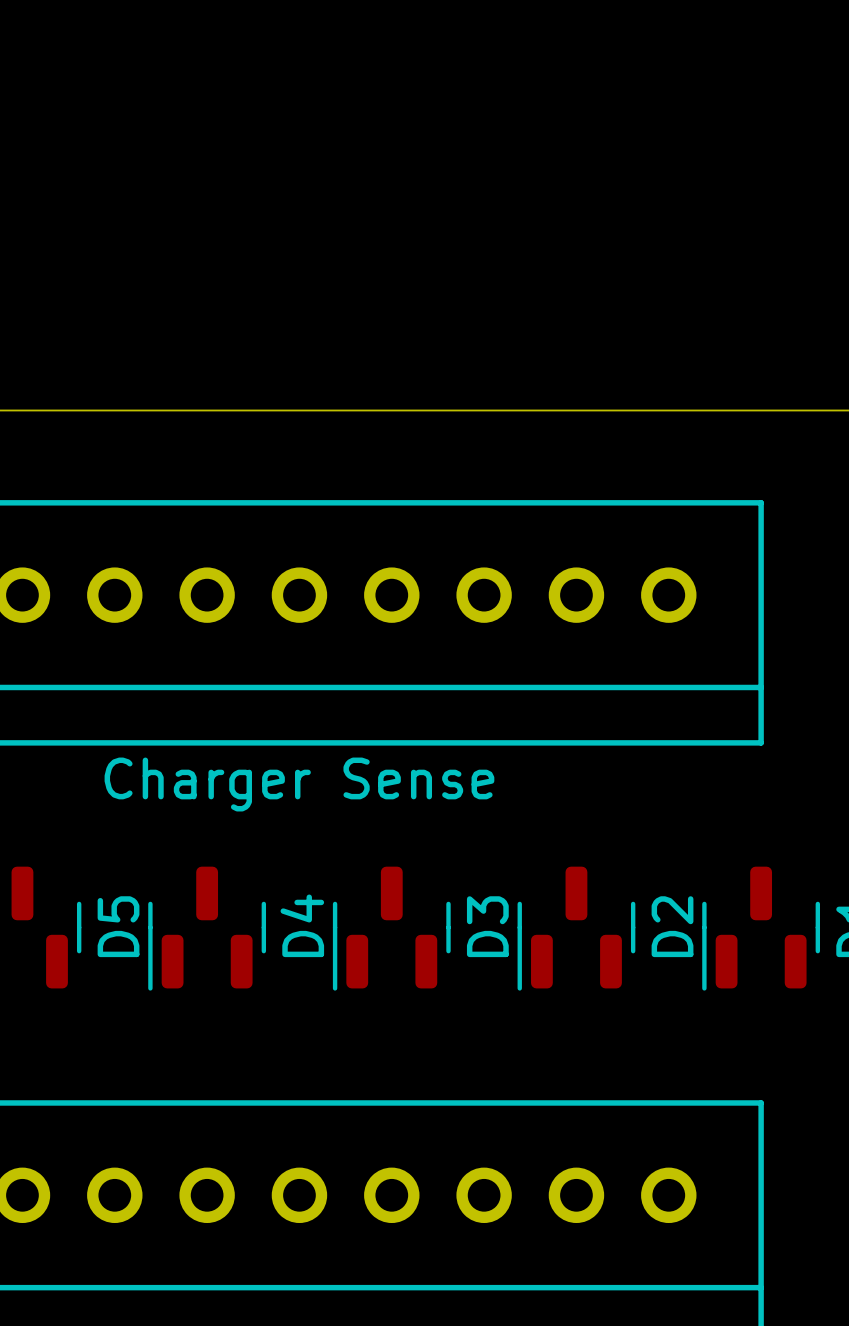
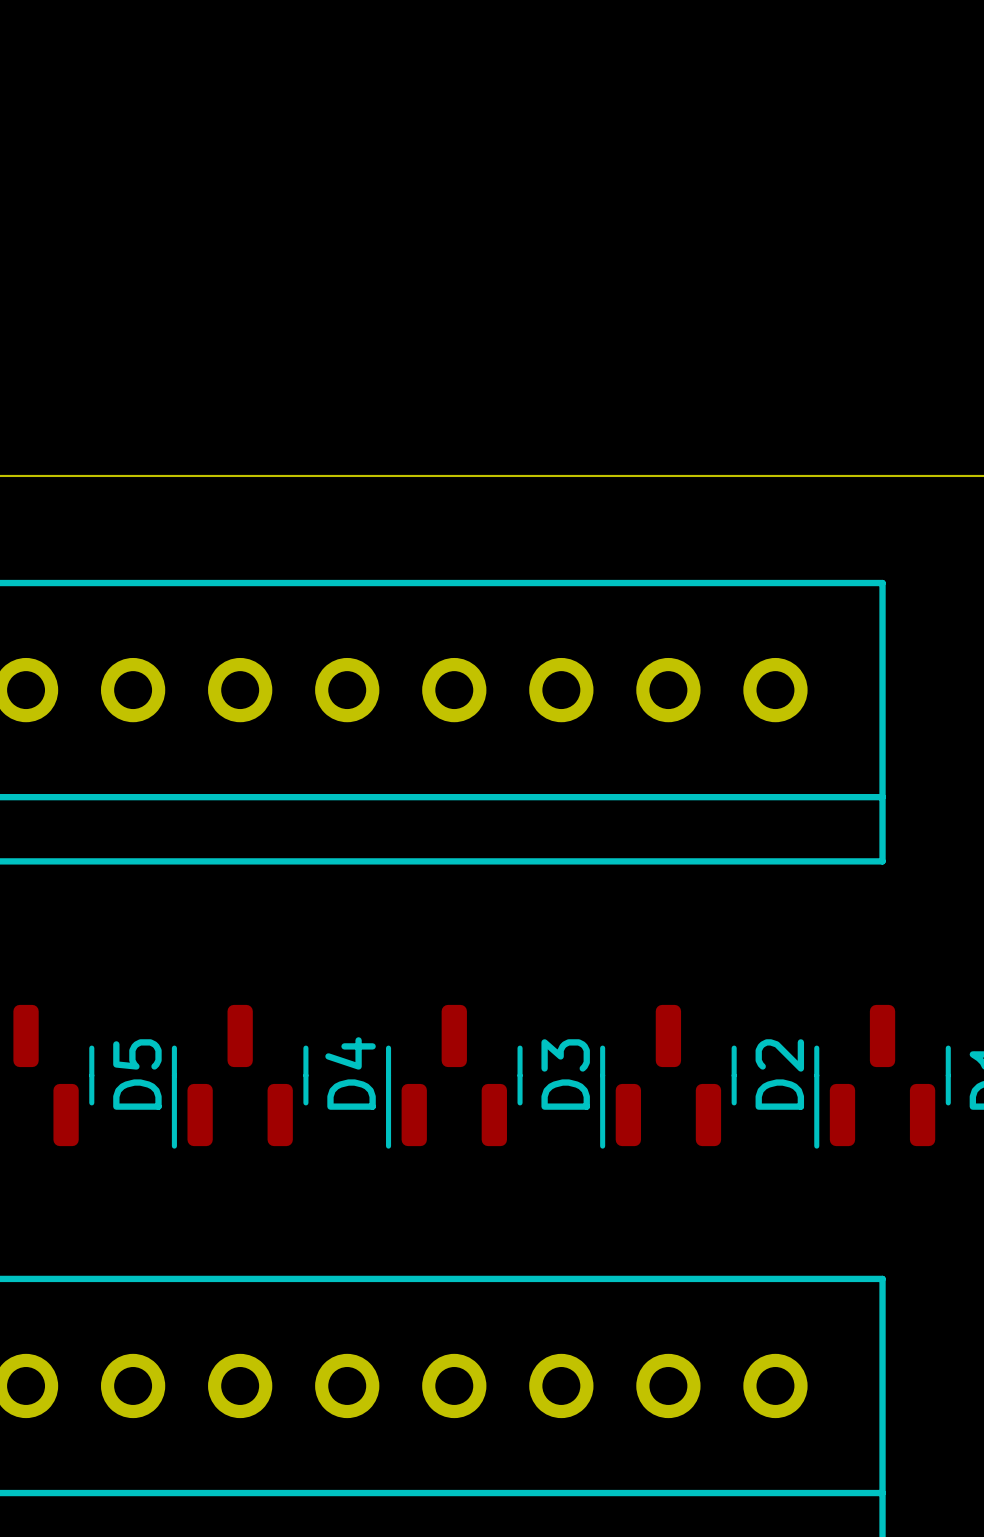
part text: Charger Sense (299, 784) -> none

